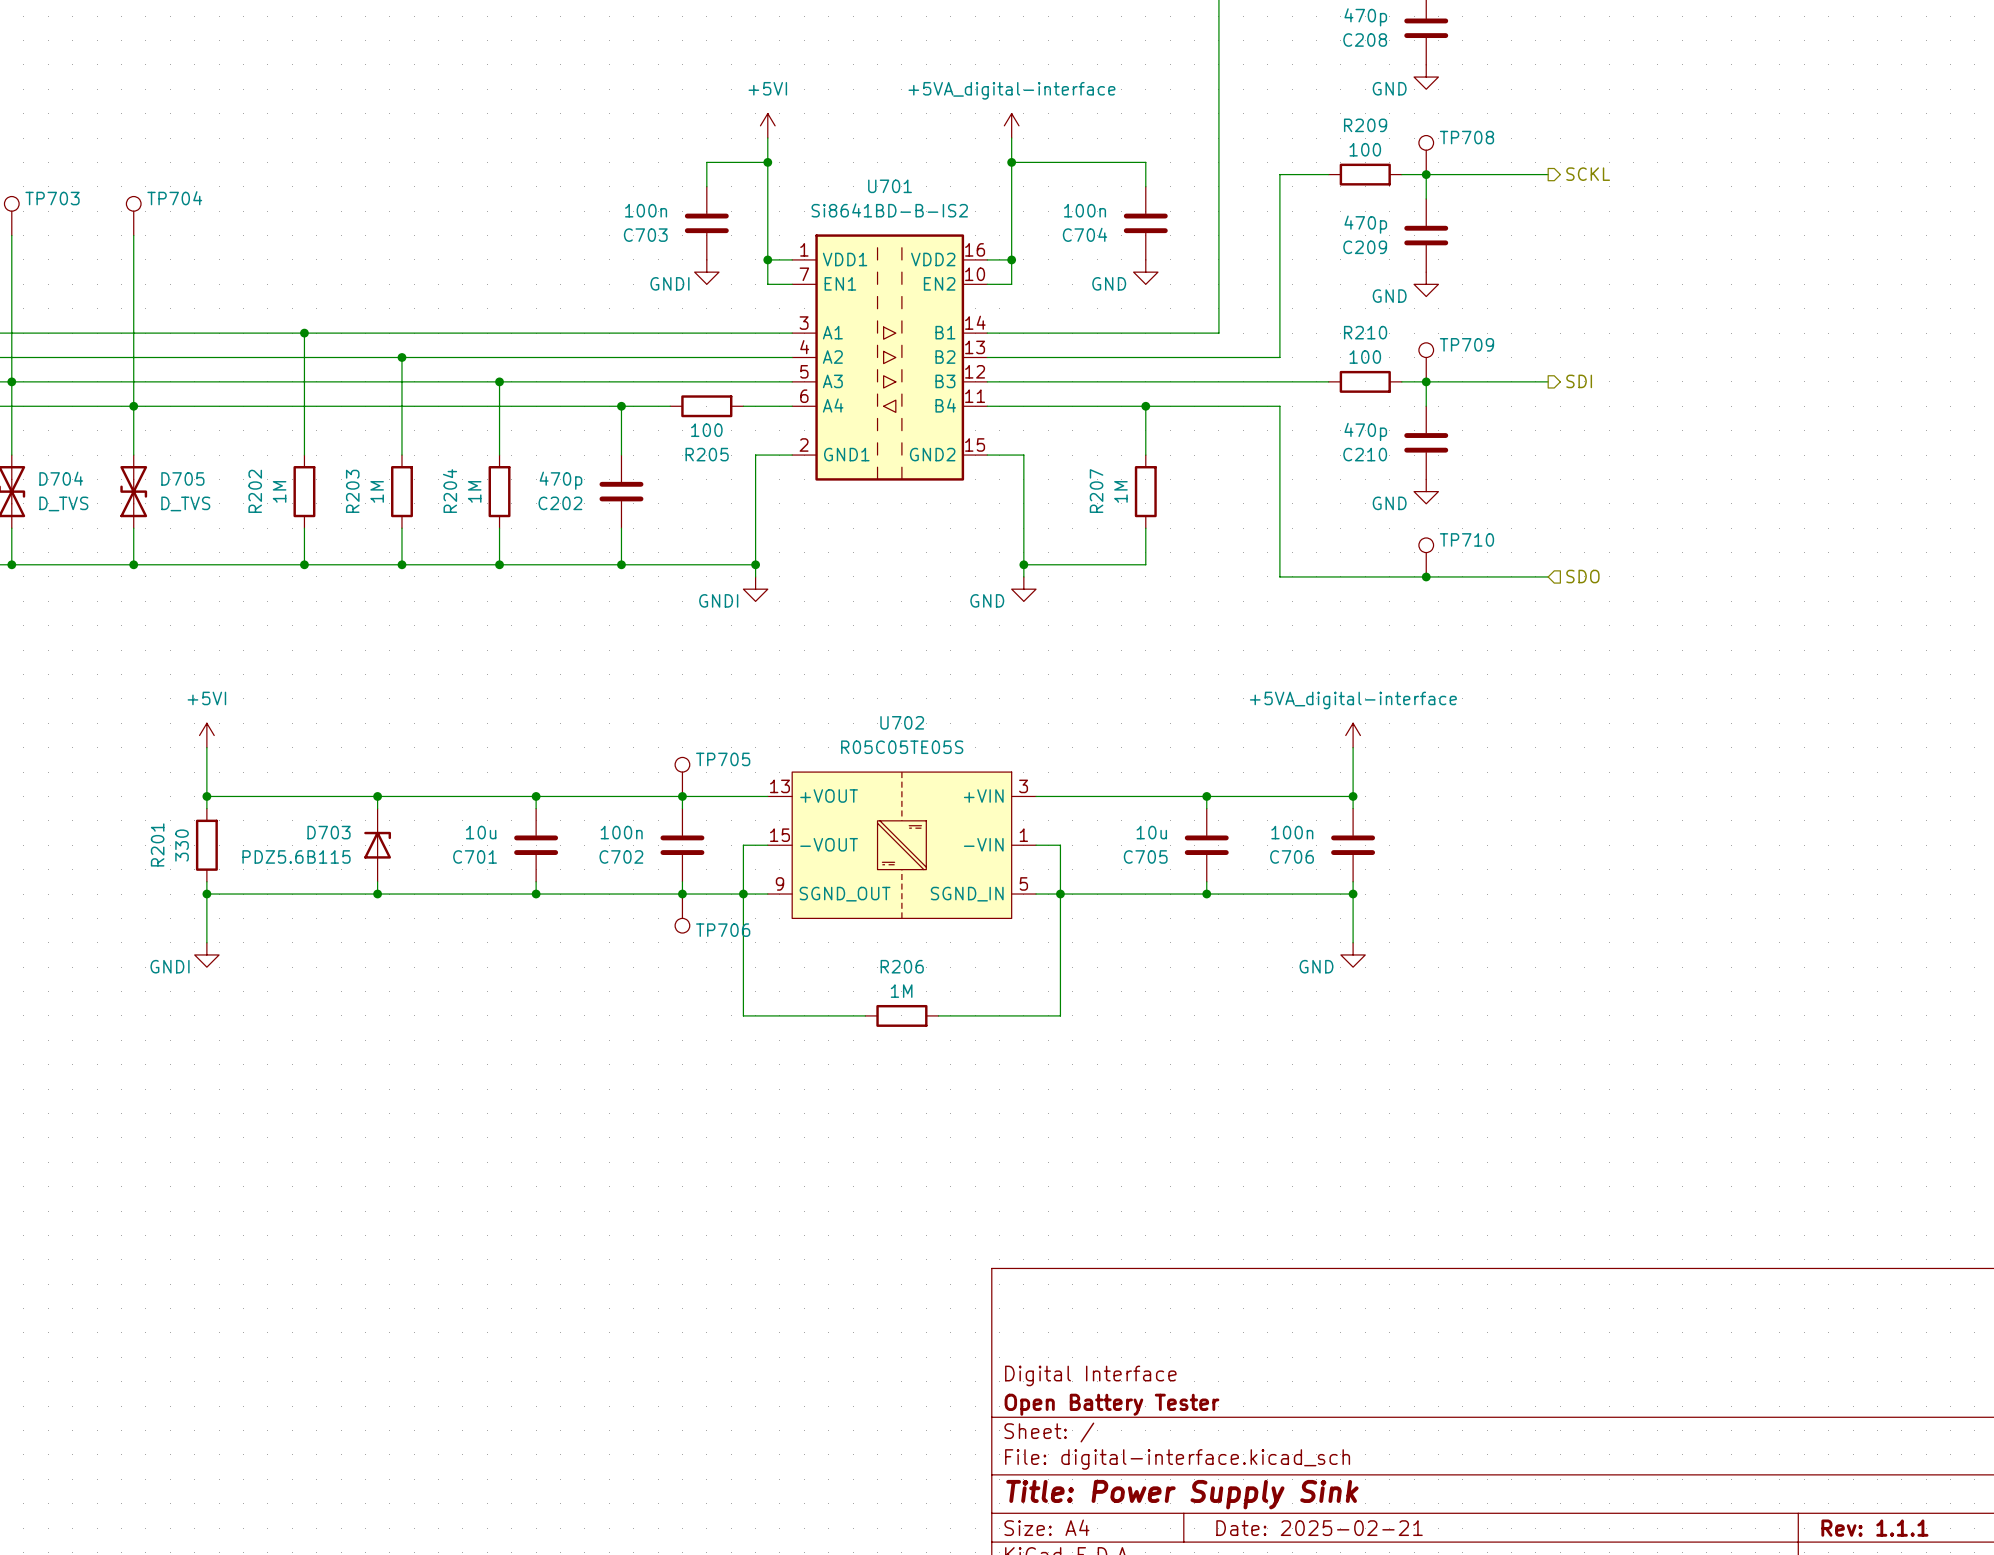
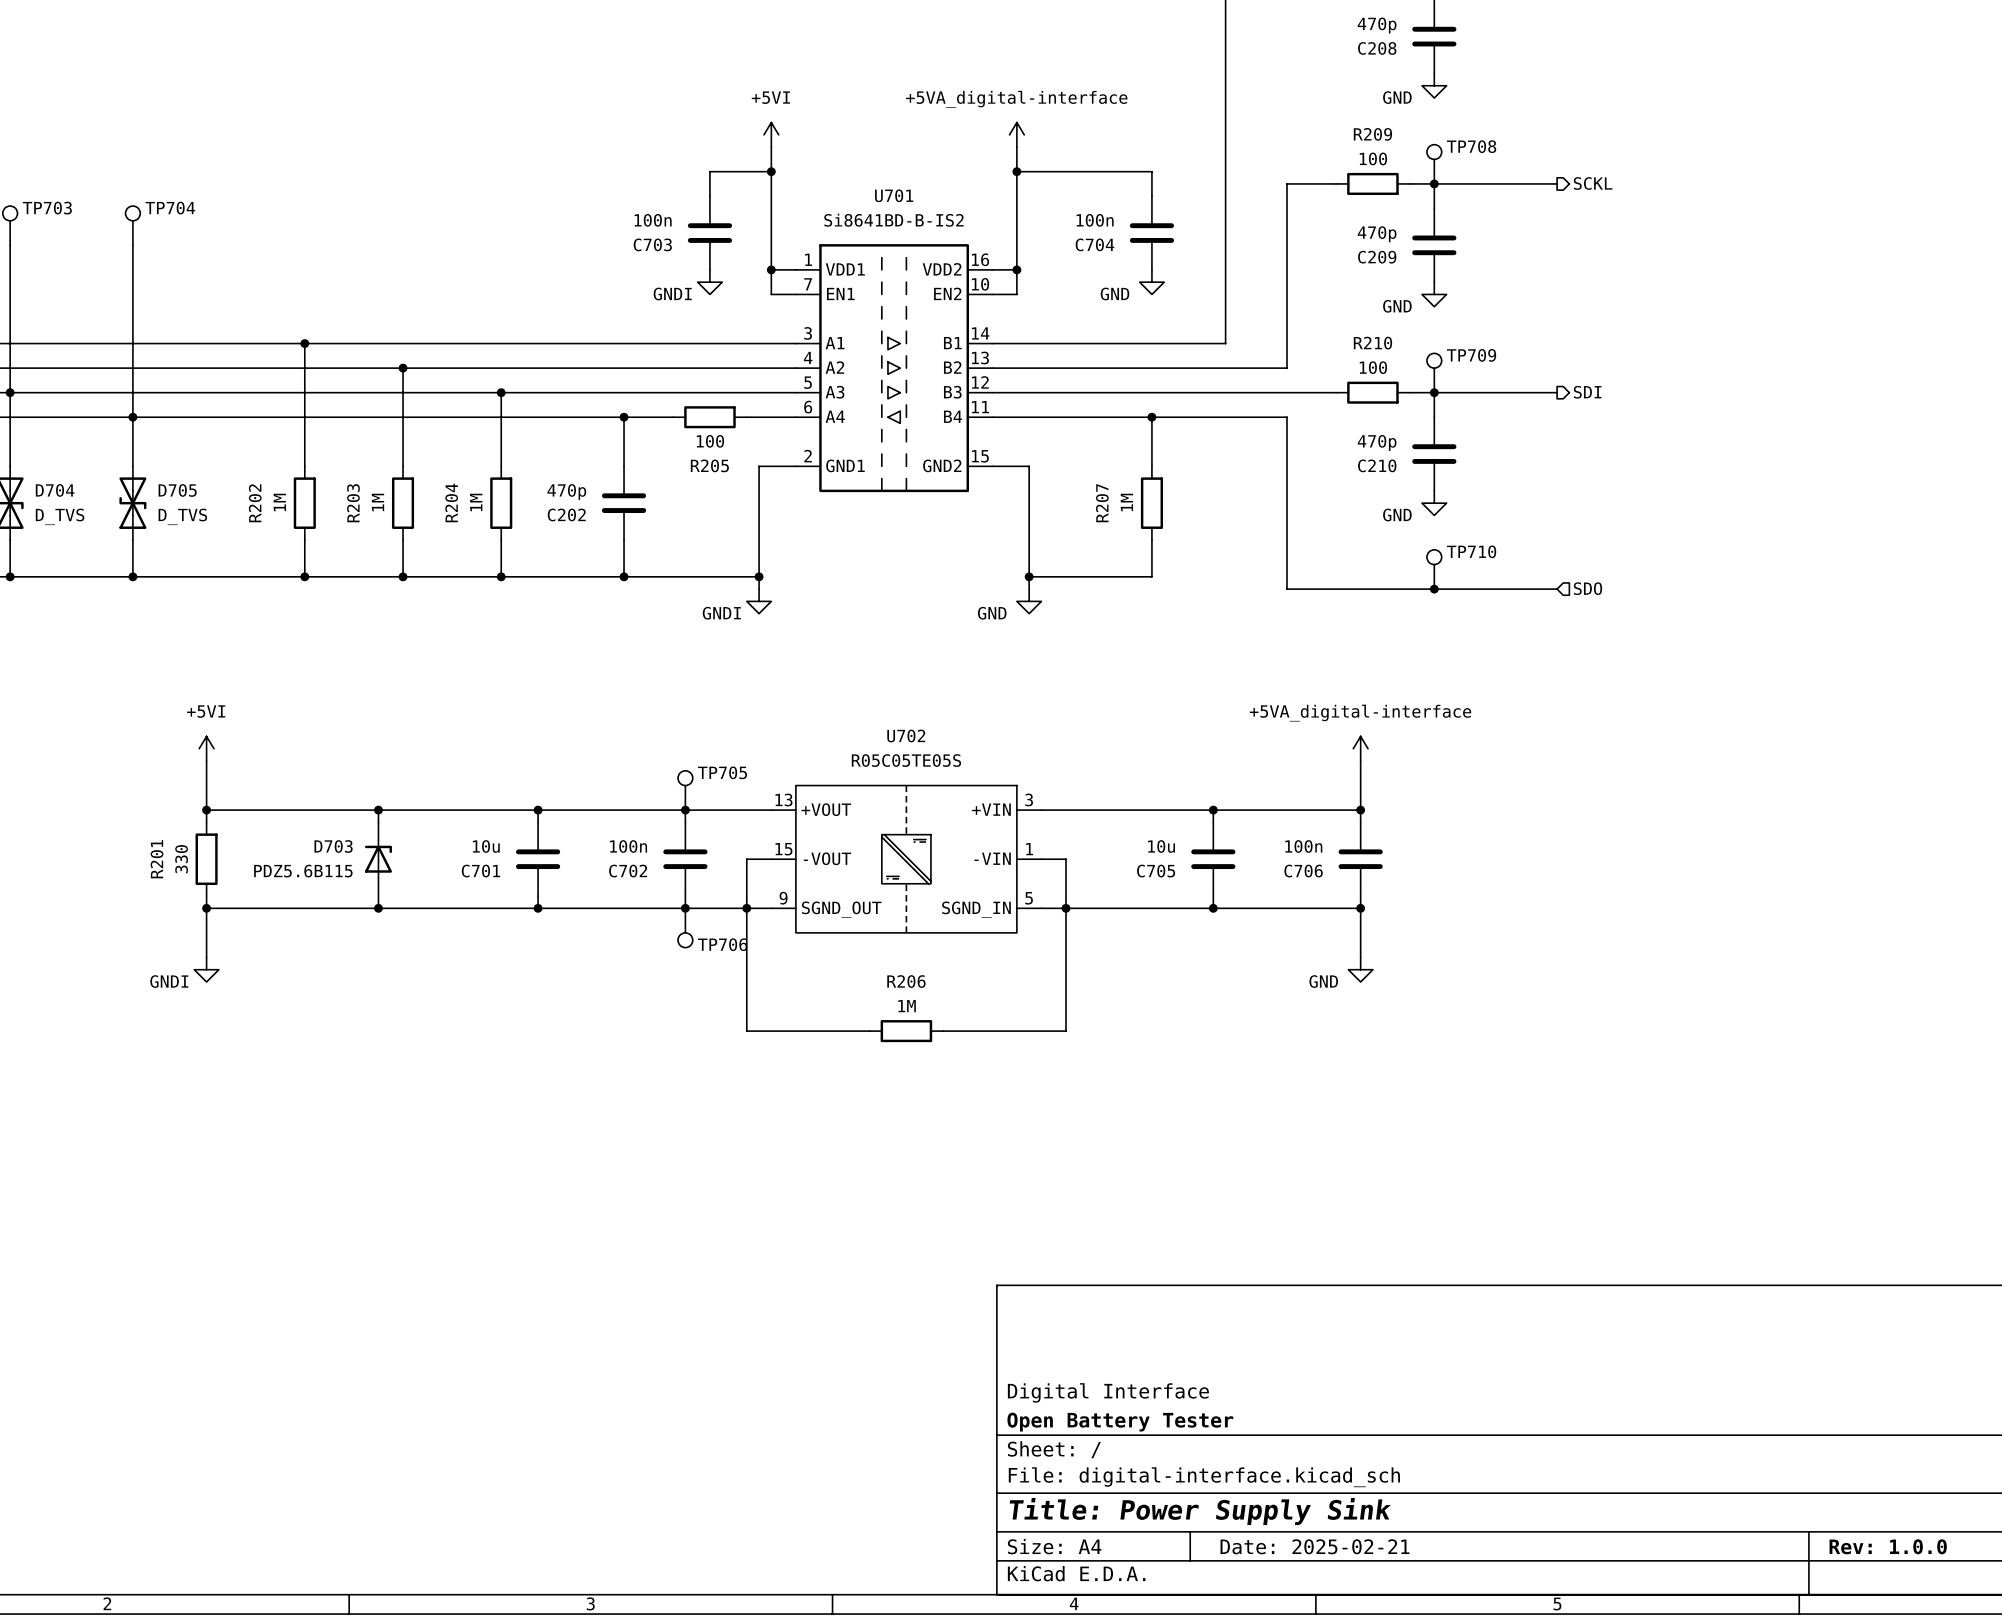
title block: Rev: 1.1.1 (1874, 1528) -> Rev: 1.0.0 (1888, 1546)

